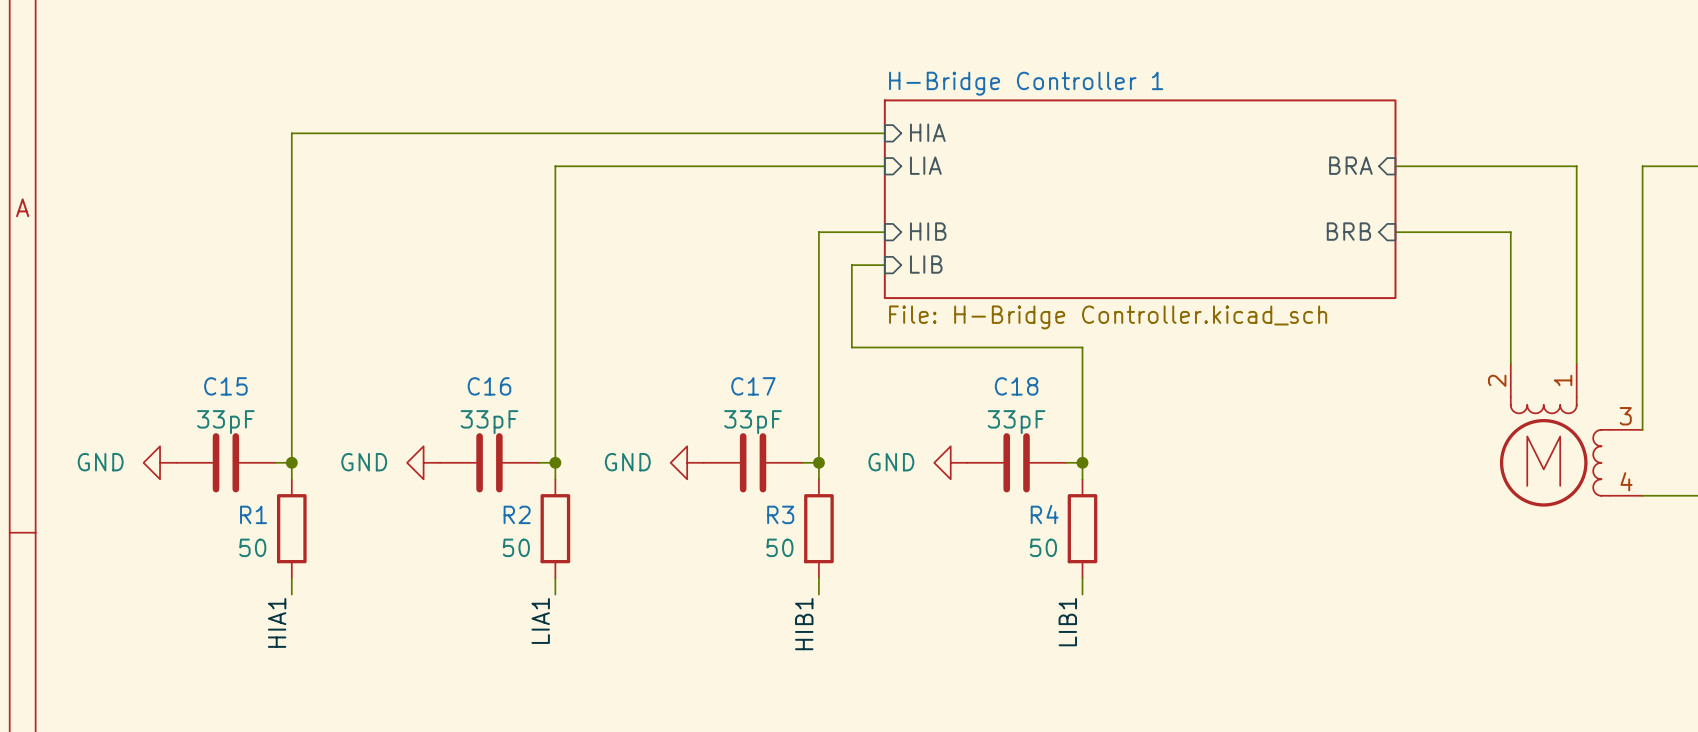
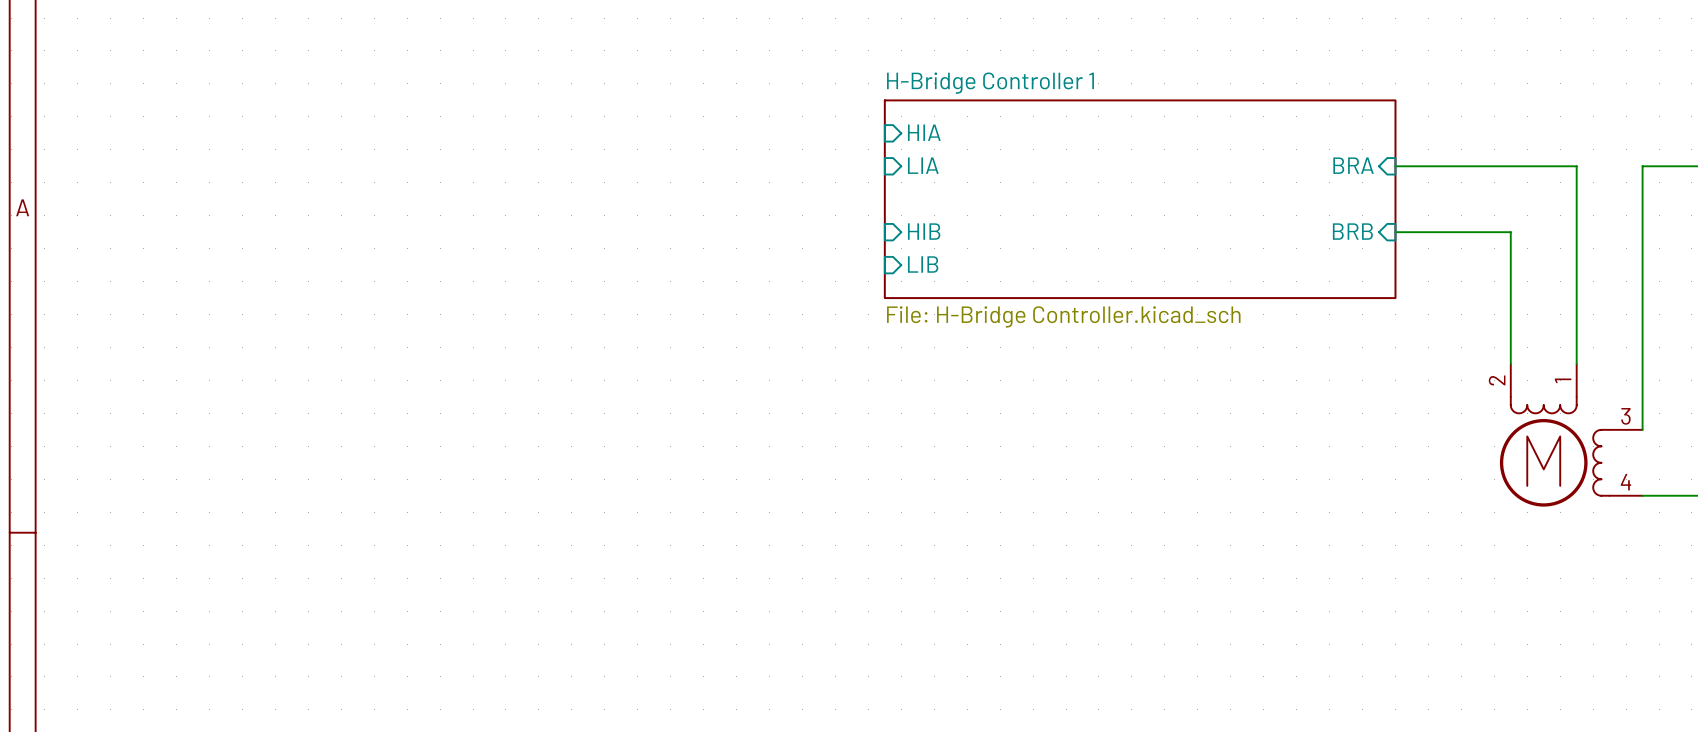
wire: (884, 133) (291, 133) (291, 479) -> none
wire: (884, 166) (555, 166) (555, 479) -> none
wire: (884, 232) (818, 232) (818, 479) -> none
wire: (884, 265) (851, 265) (851, 347) (1082, 347) (1082, 479) -> none
power symbol: GND (160, 462) -> none
C15: 33pF (225, 462) -> none
wire: (275, 462) (291, 462) -> none
junction: (291, 462) -> none
power symbol: GND (423, 462) -> none
C16: 33pF (489, 462) -> none
wire: (538, 462) (555, 462) -> none
junction: (555, 462) -> none
power symbol: GND (687, 462) -> none
C17: 33pF (753, 462) -> none
wire: (802, 462) (818, 462) -> none
junction: (818, 462) -> none
power symbol: GND (950, 462) -> none
C18: 33pF (1016, 462) -> none
wire: (1066, 462) (1082, 462) -> none
junction: (1082, 462) -> none
R1: 50 (291, 528) -> none
R2: 50 (555, 528) -> none
R3: 50 (818, 528) -> none
R4: 50 (1082, 528) -> none
wire: (291, 578) (291, 594) -> none
wire: (555, 578) (555, 594) -> none
wire: (818, 578) (818, 594) -> none
wire: (1082, 578) (1082, 594) -> none
label: LIA1 (540, 620) -> none
label: HIA1 (277, 622) -> none
label: LIB1 (1067, 622) -> none
label: HIB1 (804, 624) -> none

